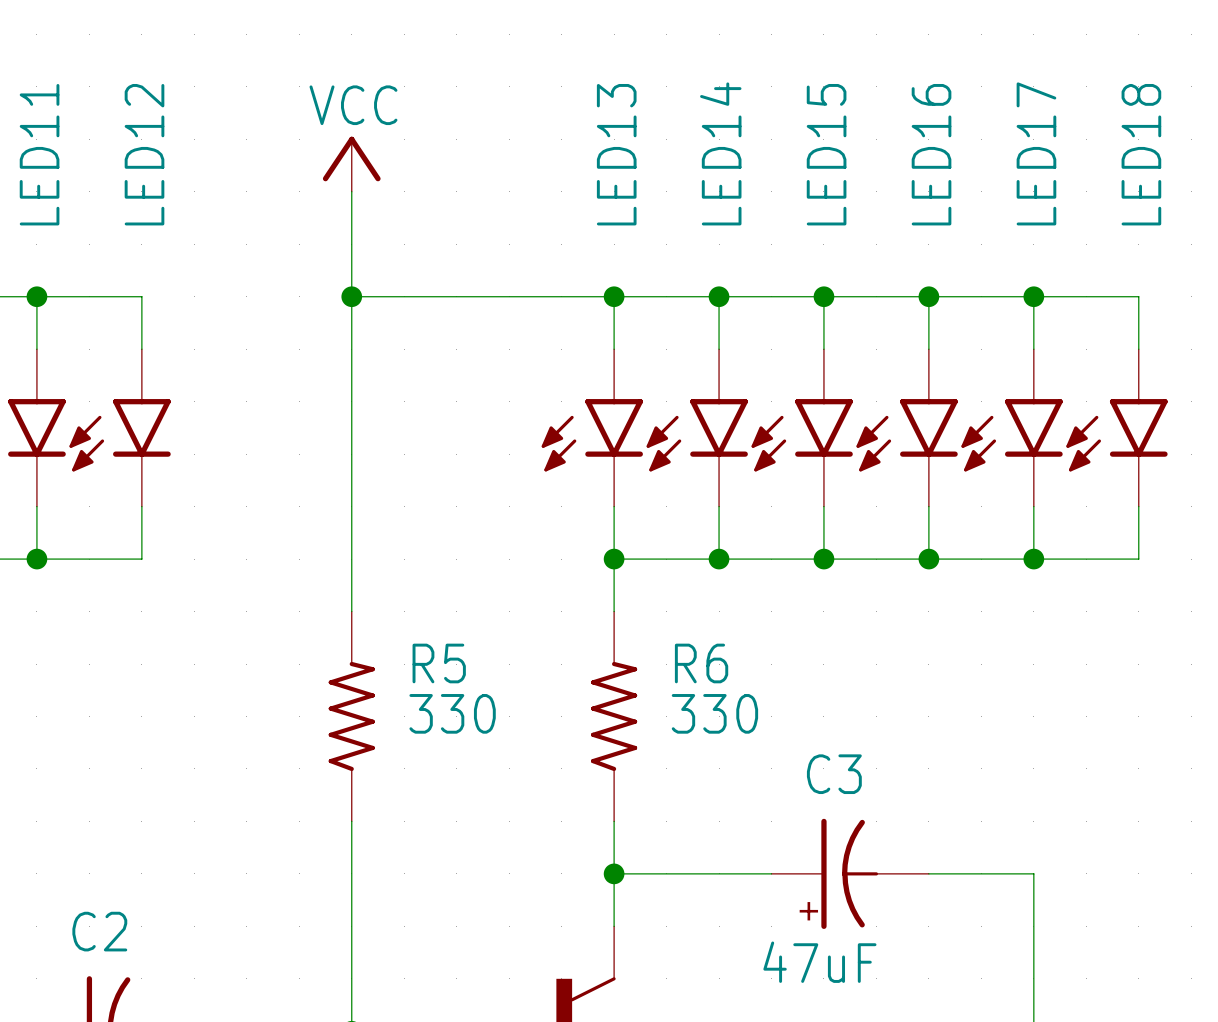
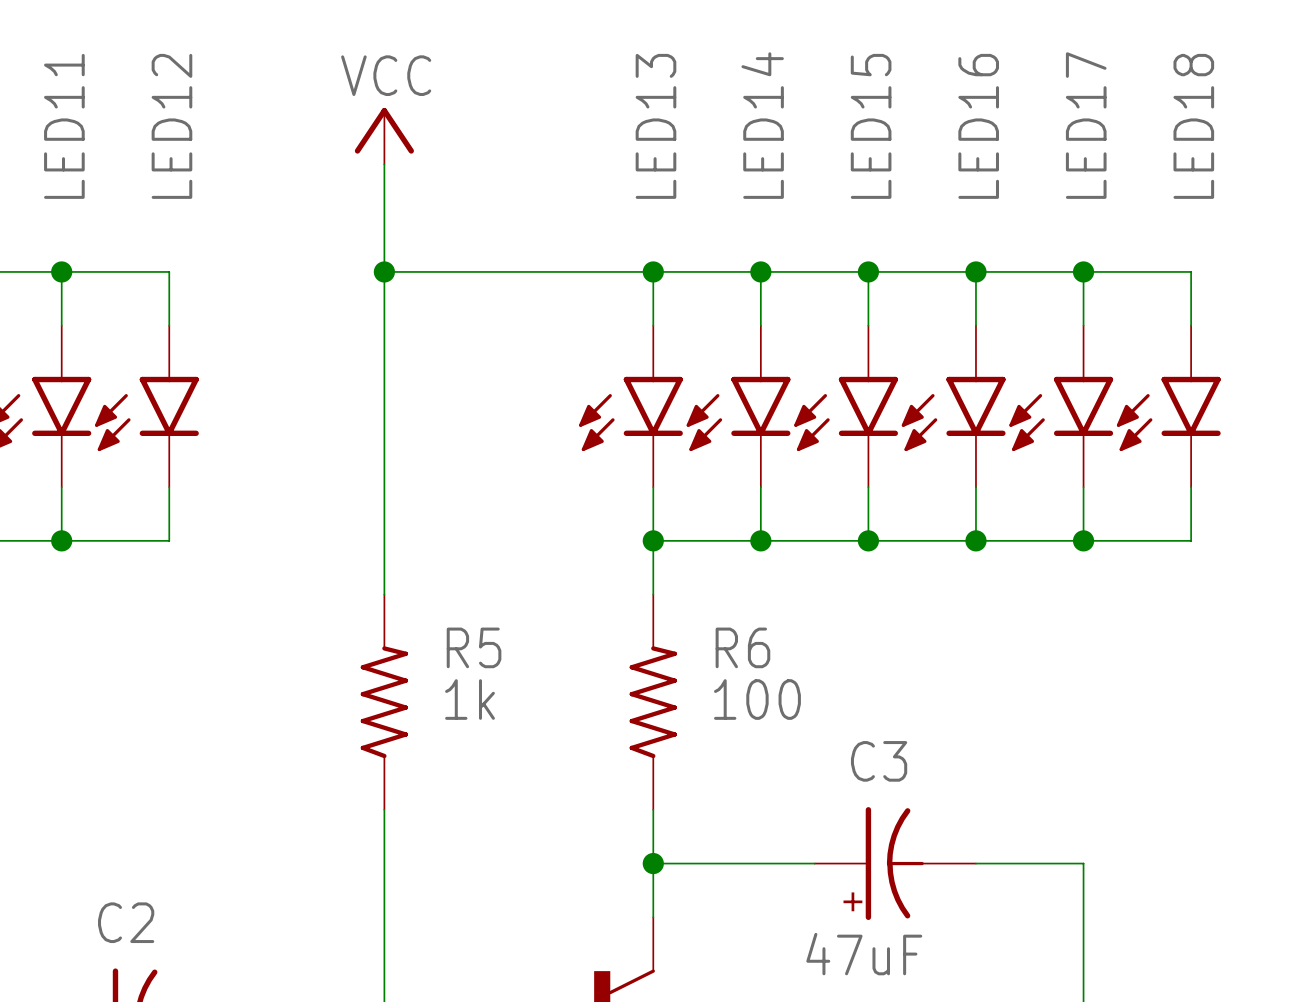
R5 value: 330 (452, 713) -> 1k (470, 699)
R6 value: 330 (714, 713) -> 100 (757, 699)

